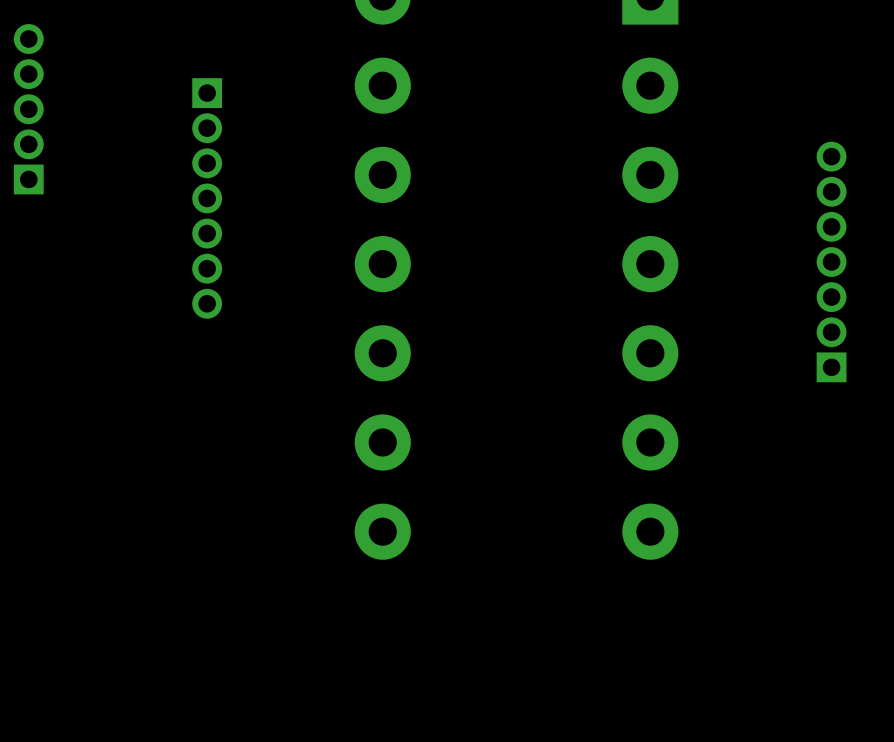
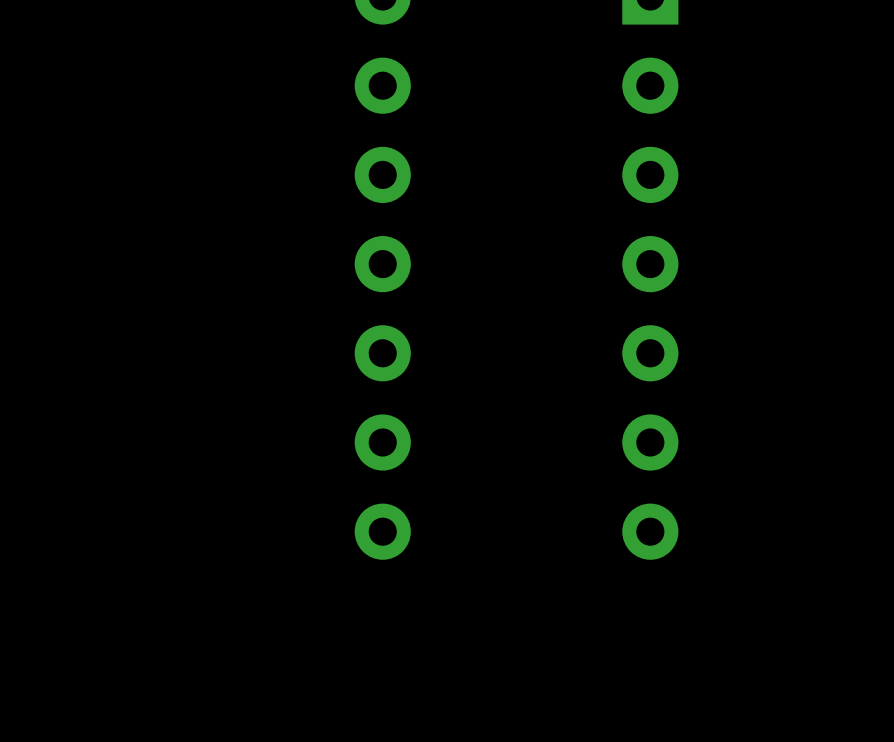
part: (28, 109) -> none
part: (207, 198) -> none
part: (831, 261) -> none

